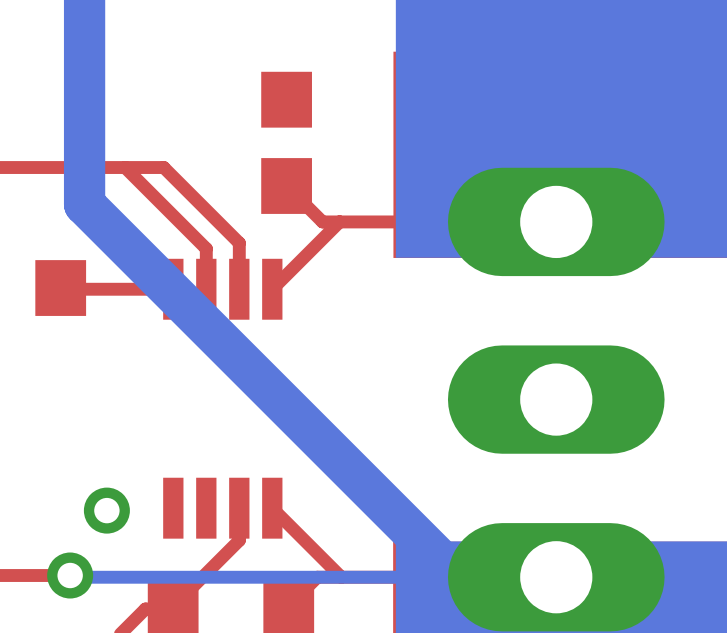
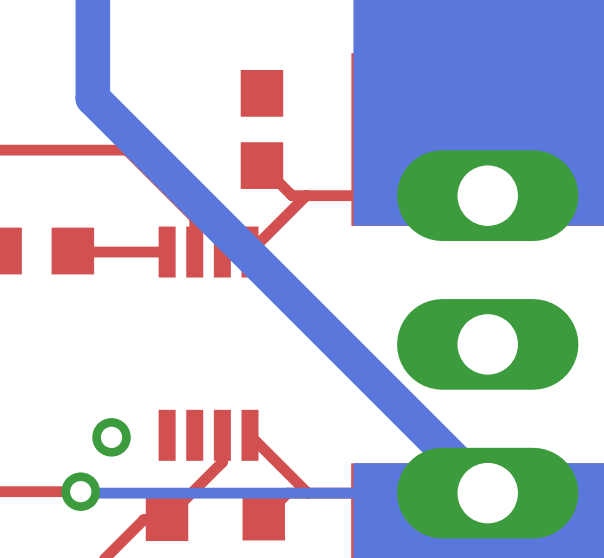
bottom track: (84, 105) (84, 204) (470, 590) (556, 577) -> (92, 98) (487, 493)

